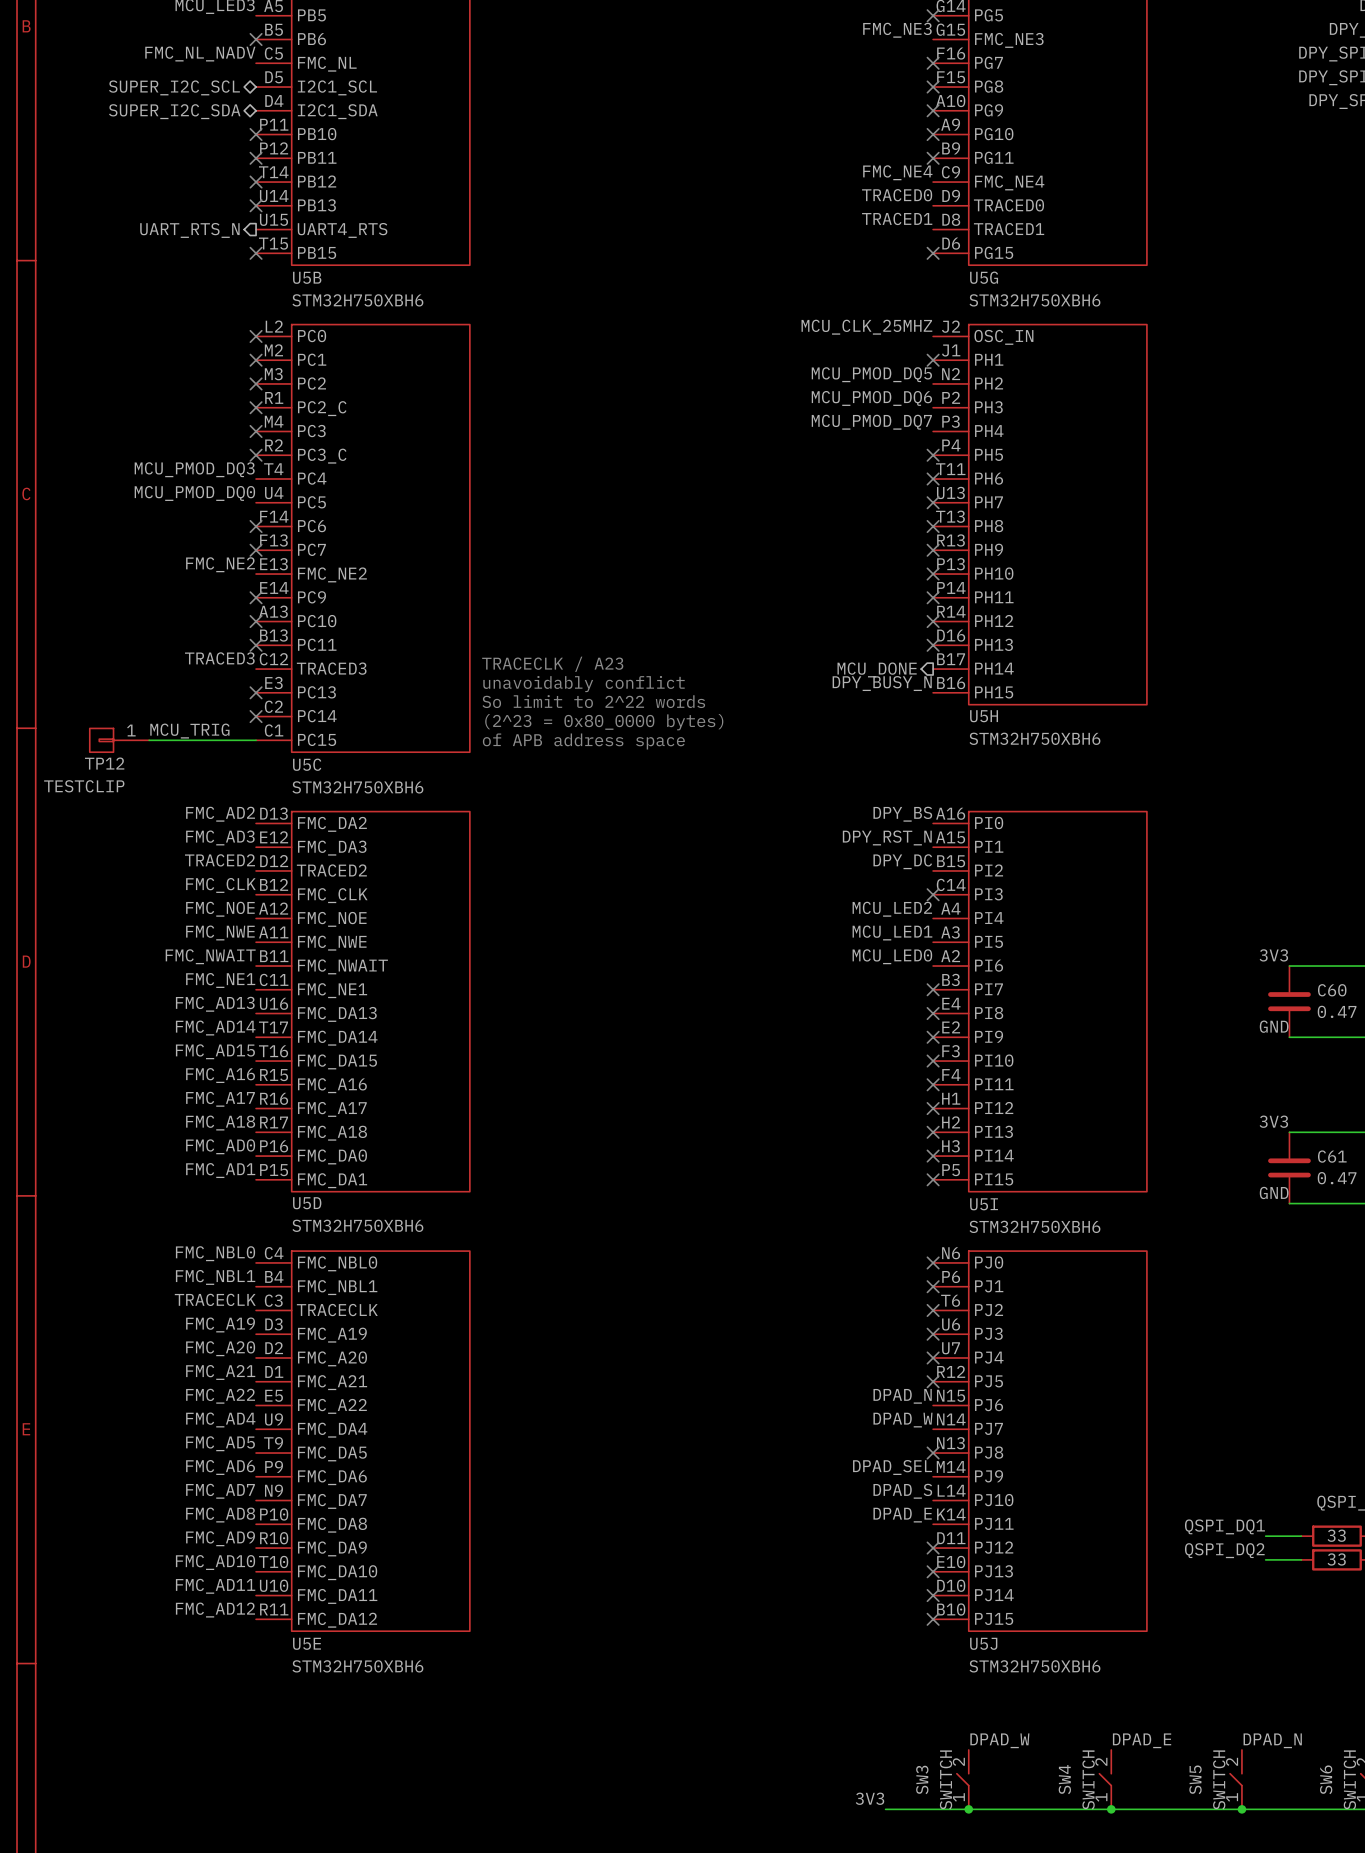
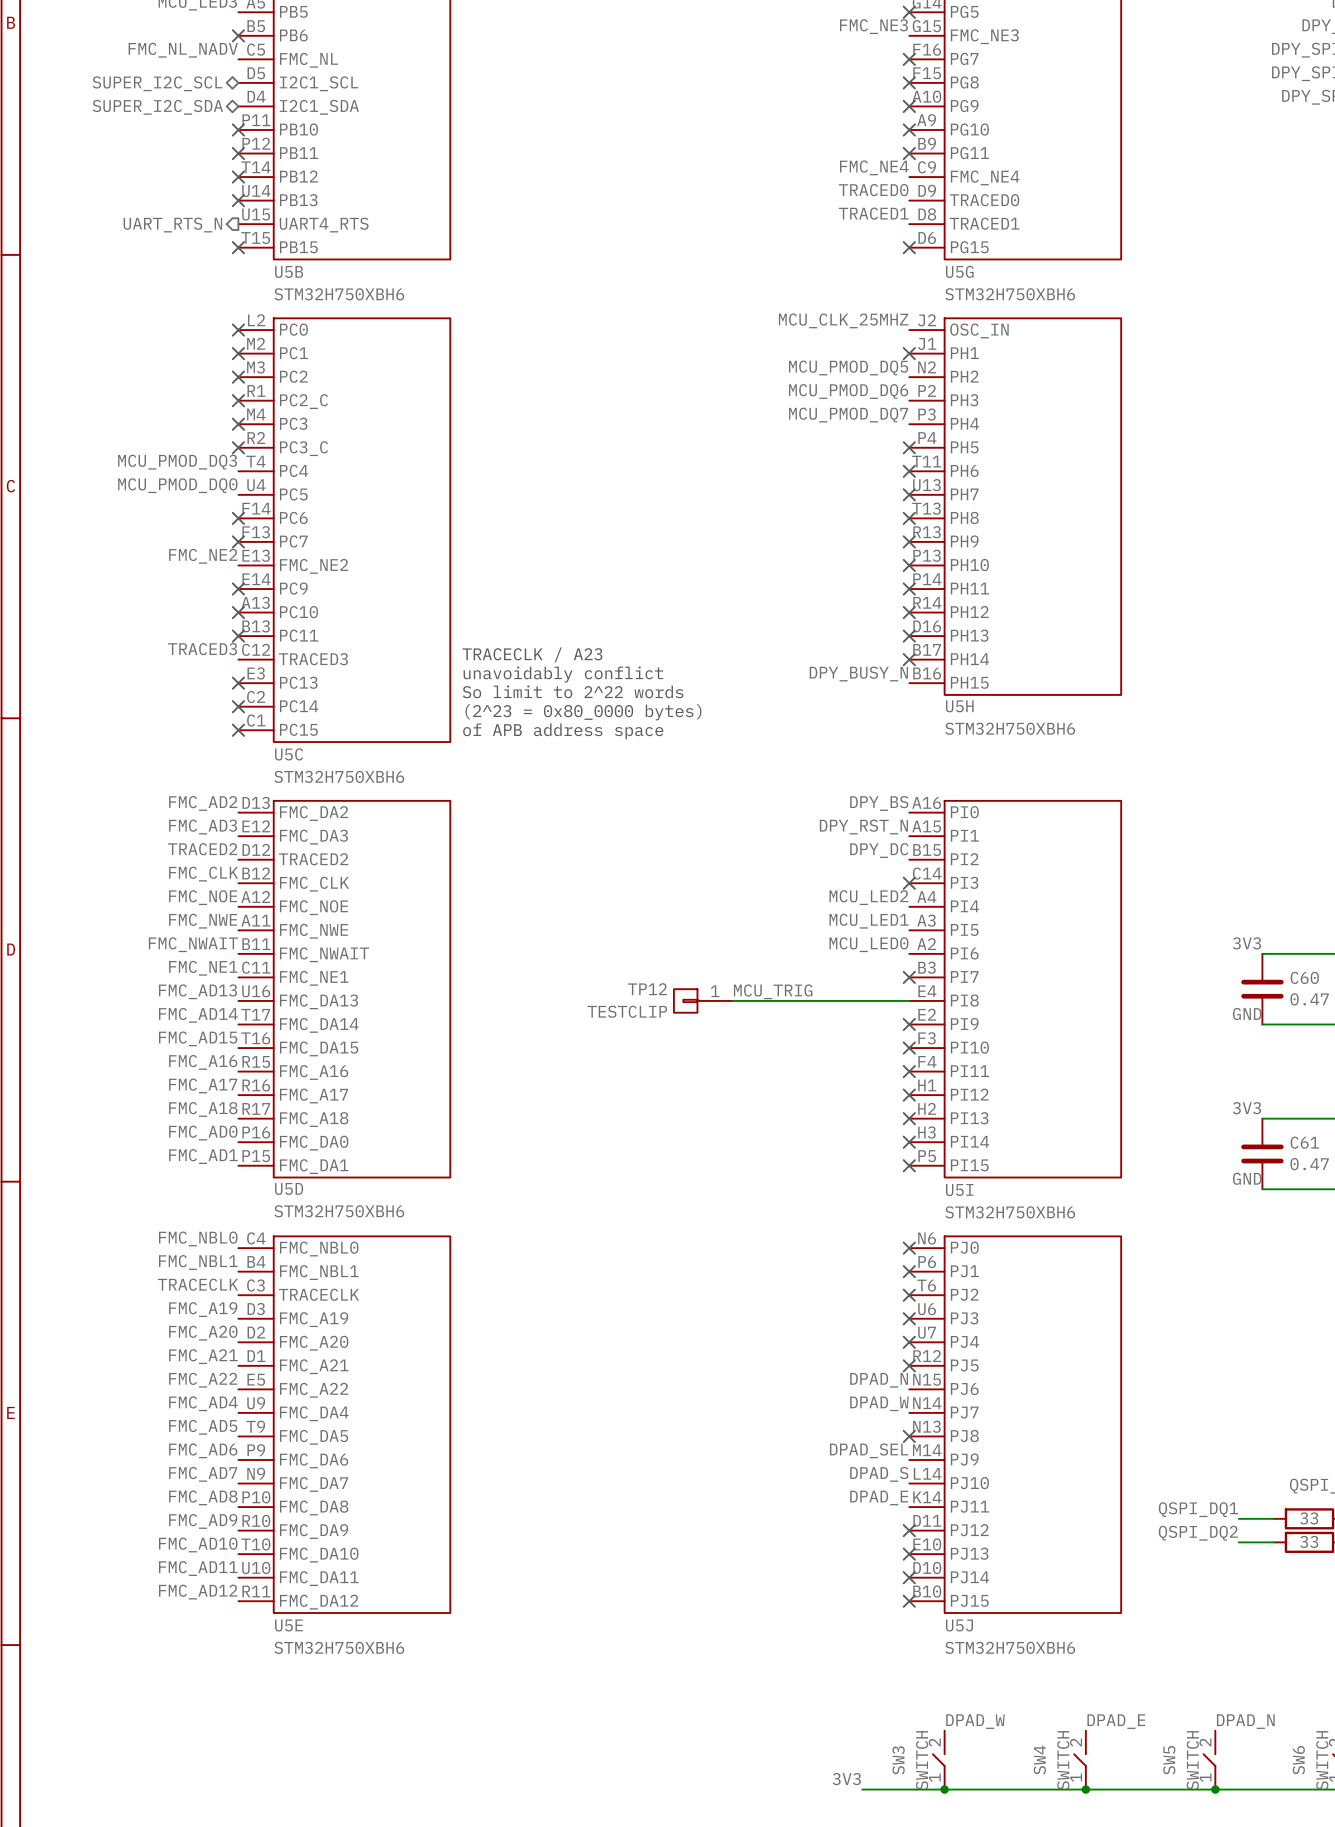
hierarchical label: MCU_DONE (877, 669) -> none
no-connect mark: none -> (909, 659)
label: MCU_TRIG (189, 731) -> none
TP12 position: (119, 740) -> (703, 1000)
wire: (149, 740) (256, 740) -> none
no-connect mark: none -> (238, 730)
TP12 name position: TP12 (104, 763) -> TP12 (647, 989)
TP12 value position: TESTCLIP (84, 786) -> TESTCLIP (627, 1011)
label: none -> MCU_TRIG (773, 991)
wire: none -> (732, 1000) (909, 1000)
no-connect mark: (933, 1013) -> none

